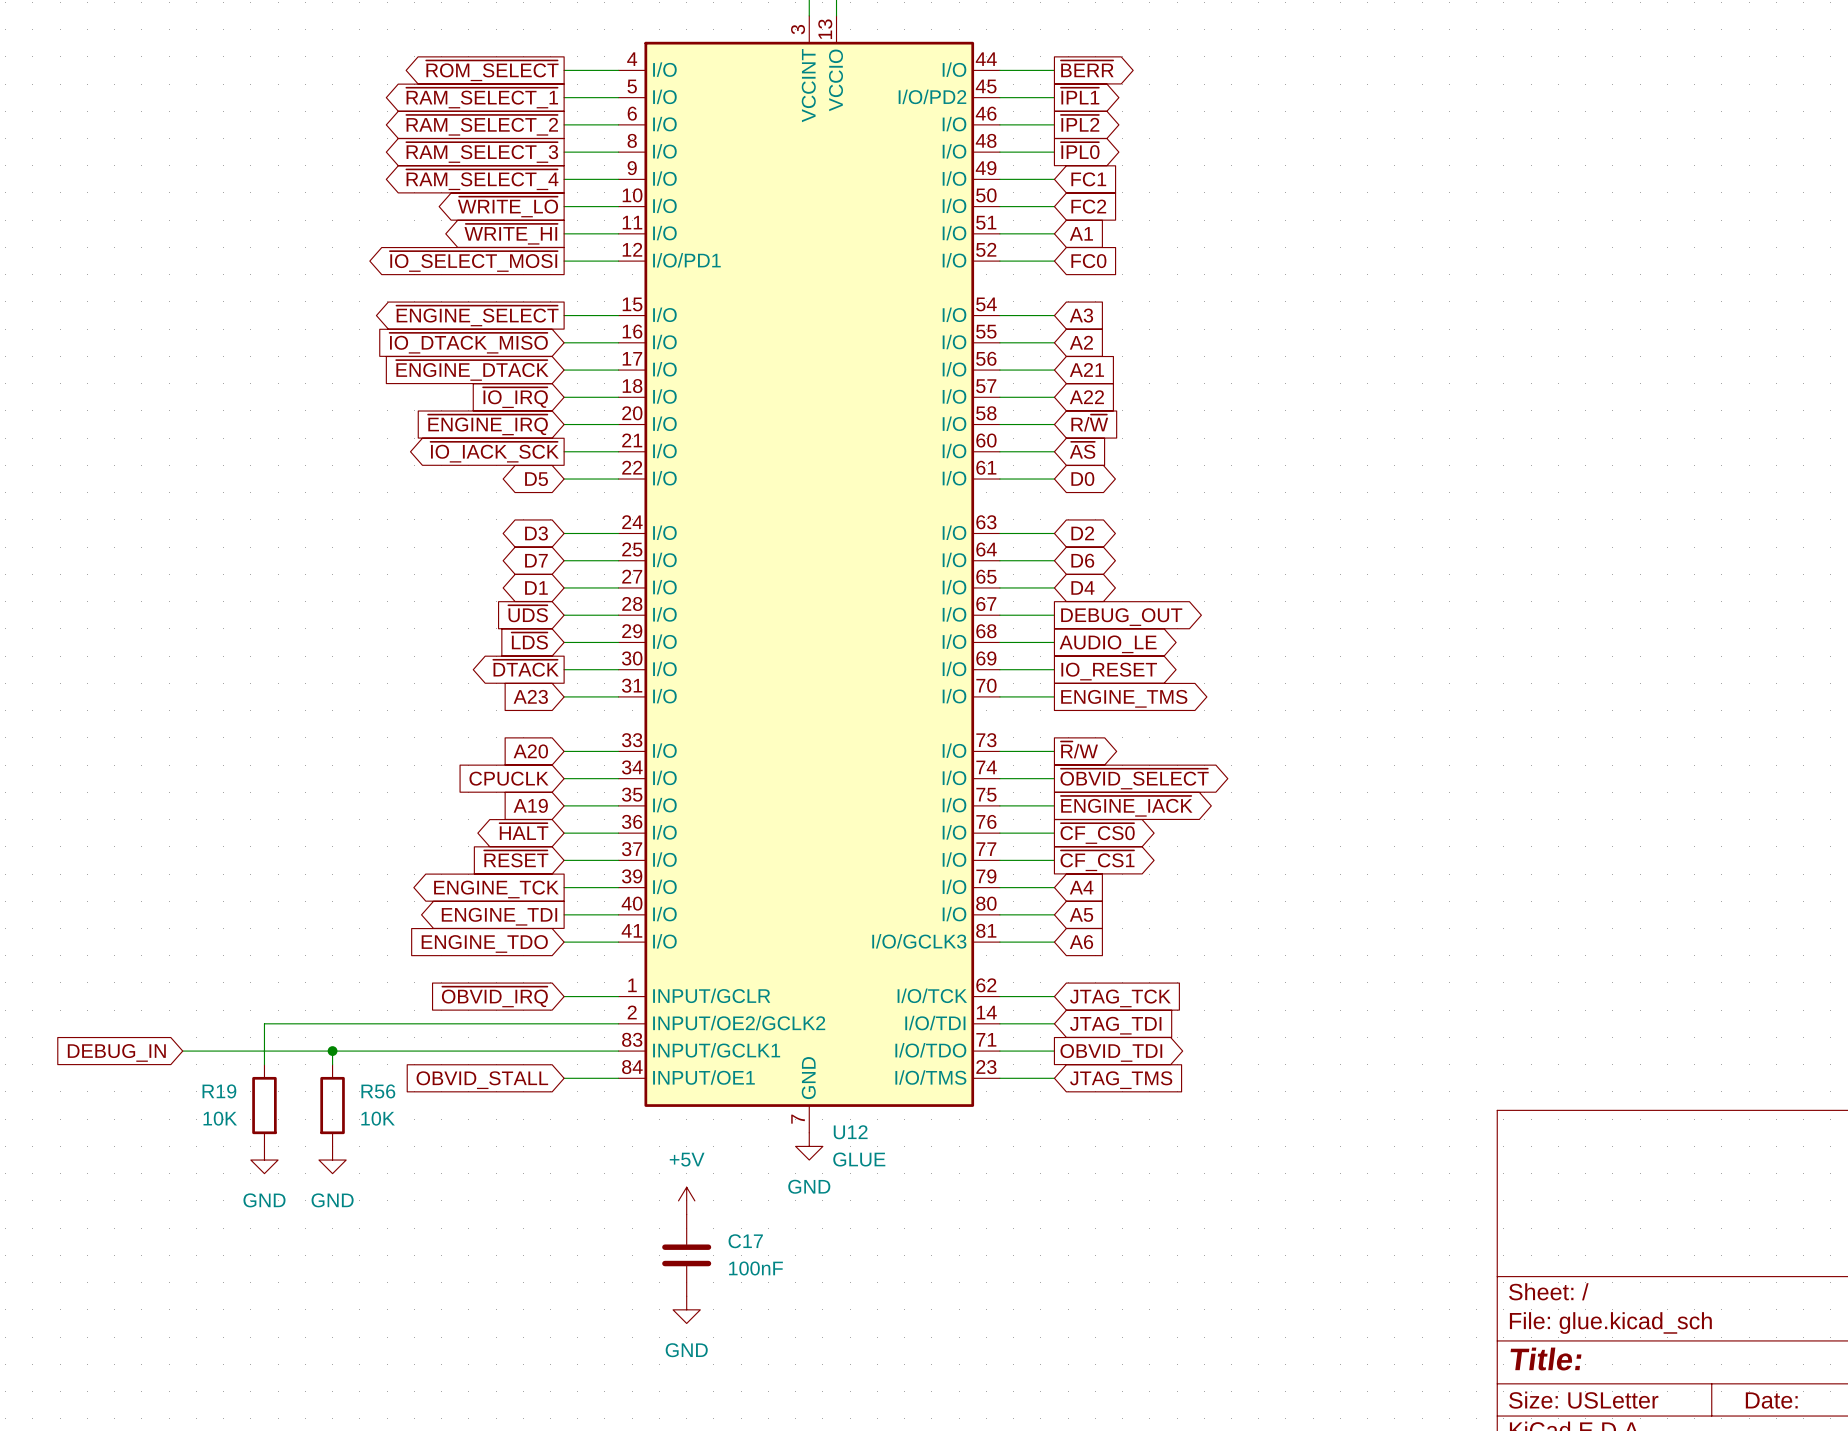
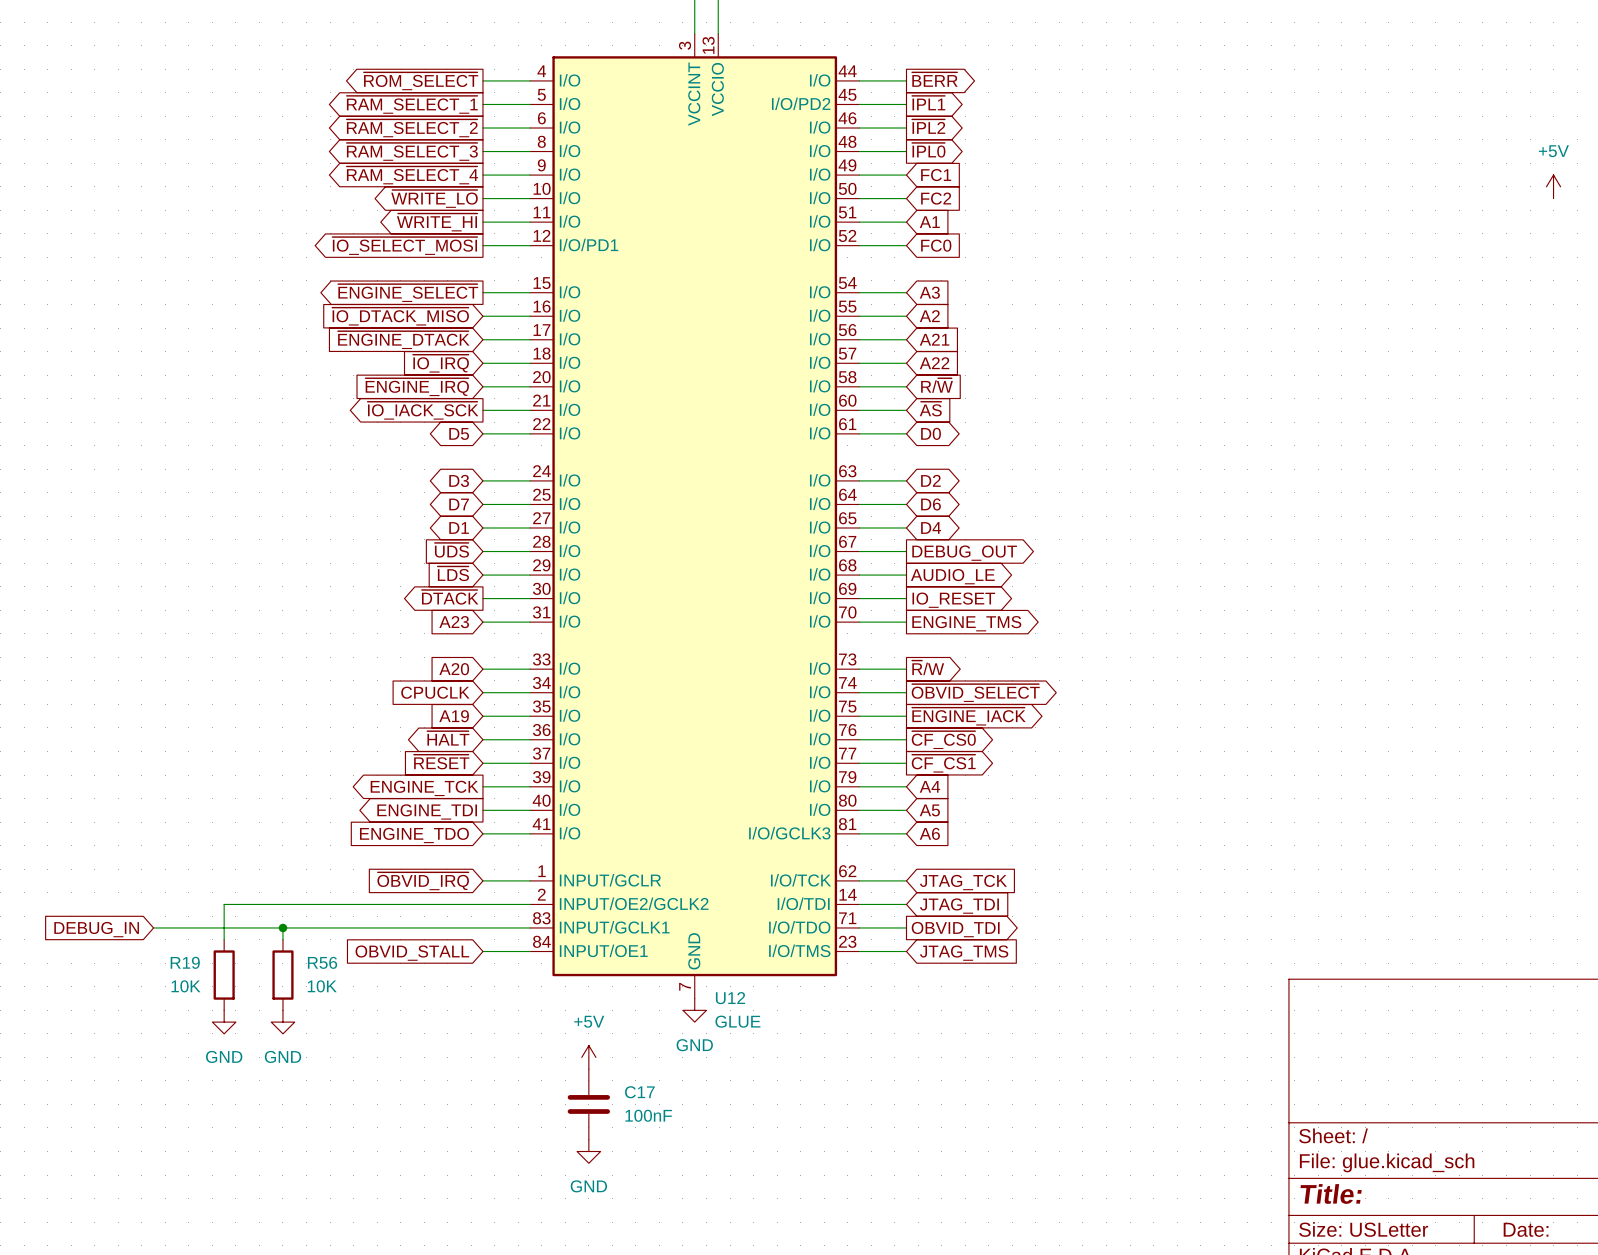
power symbol: none -> +5V (1553, 186)

